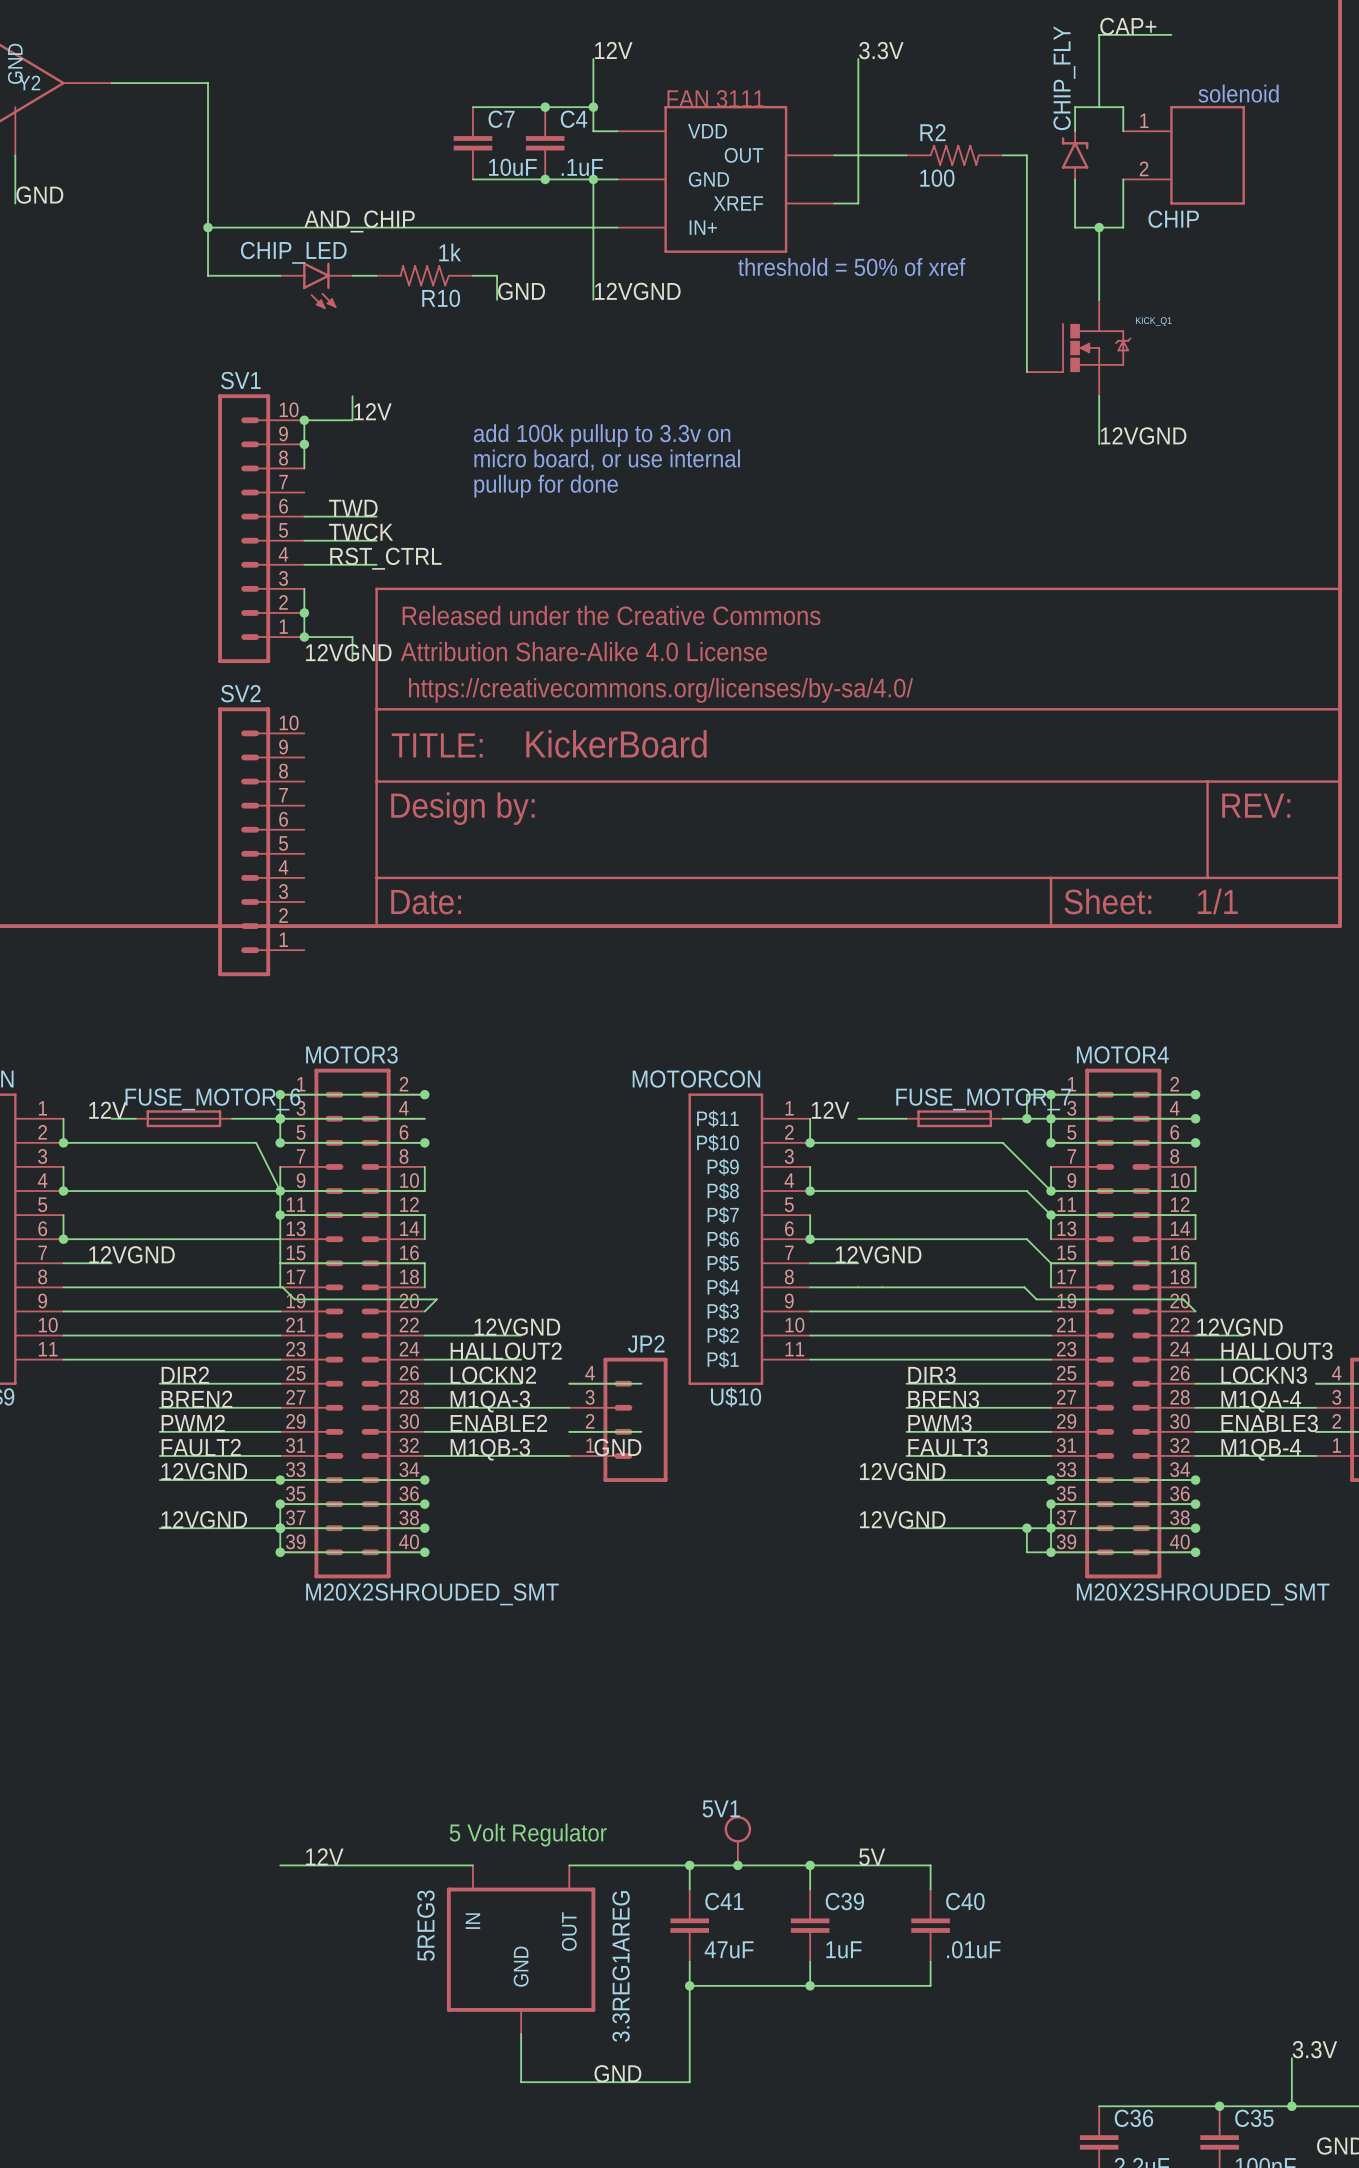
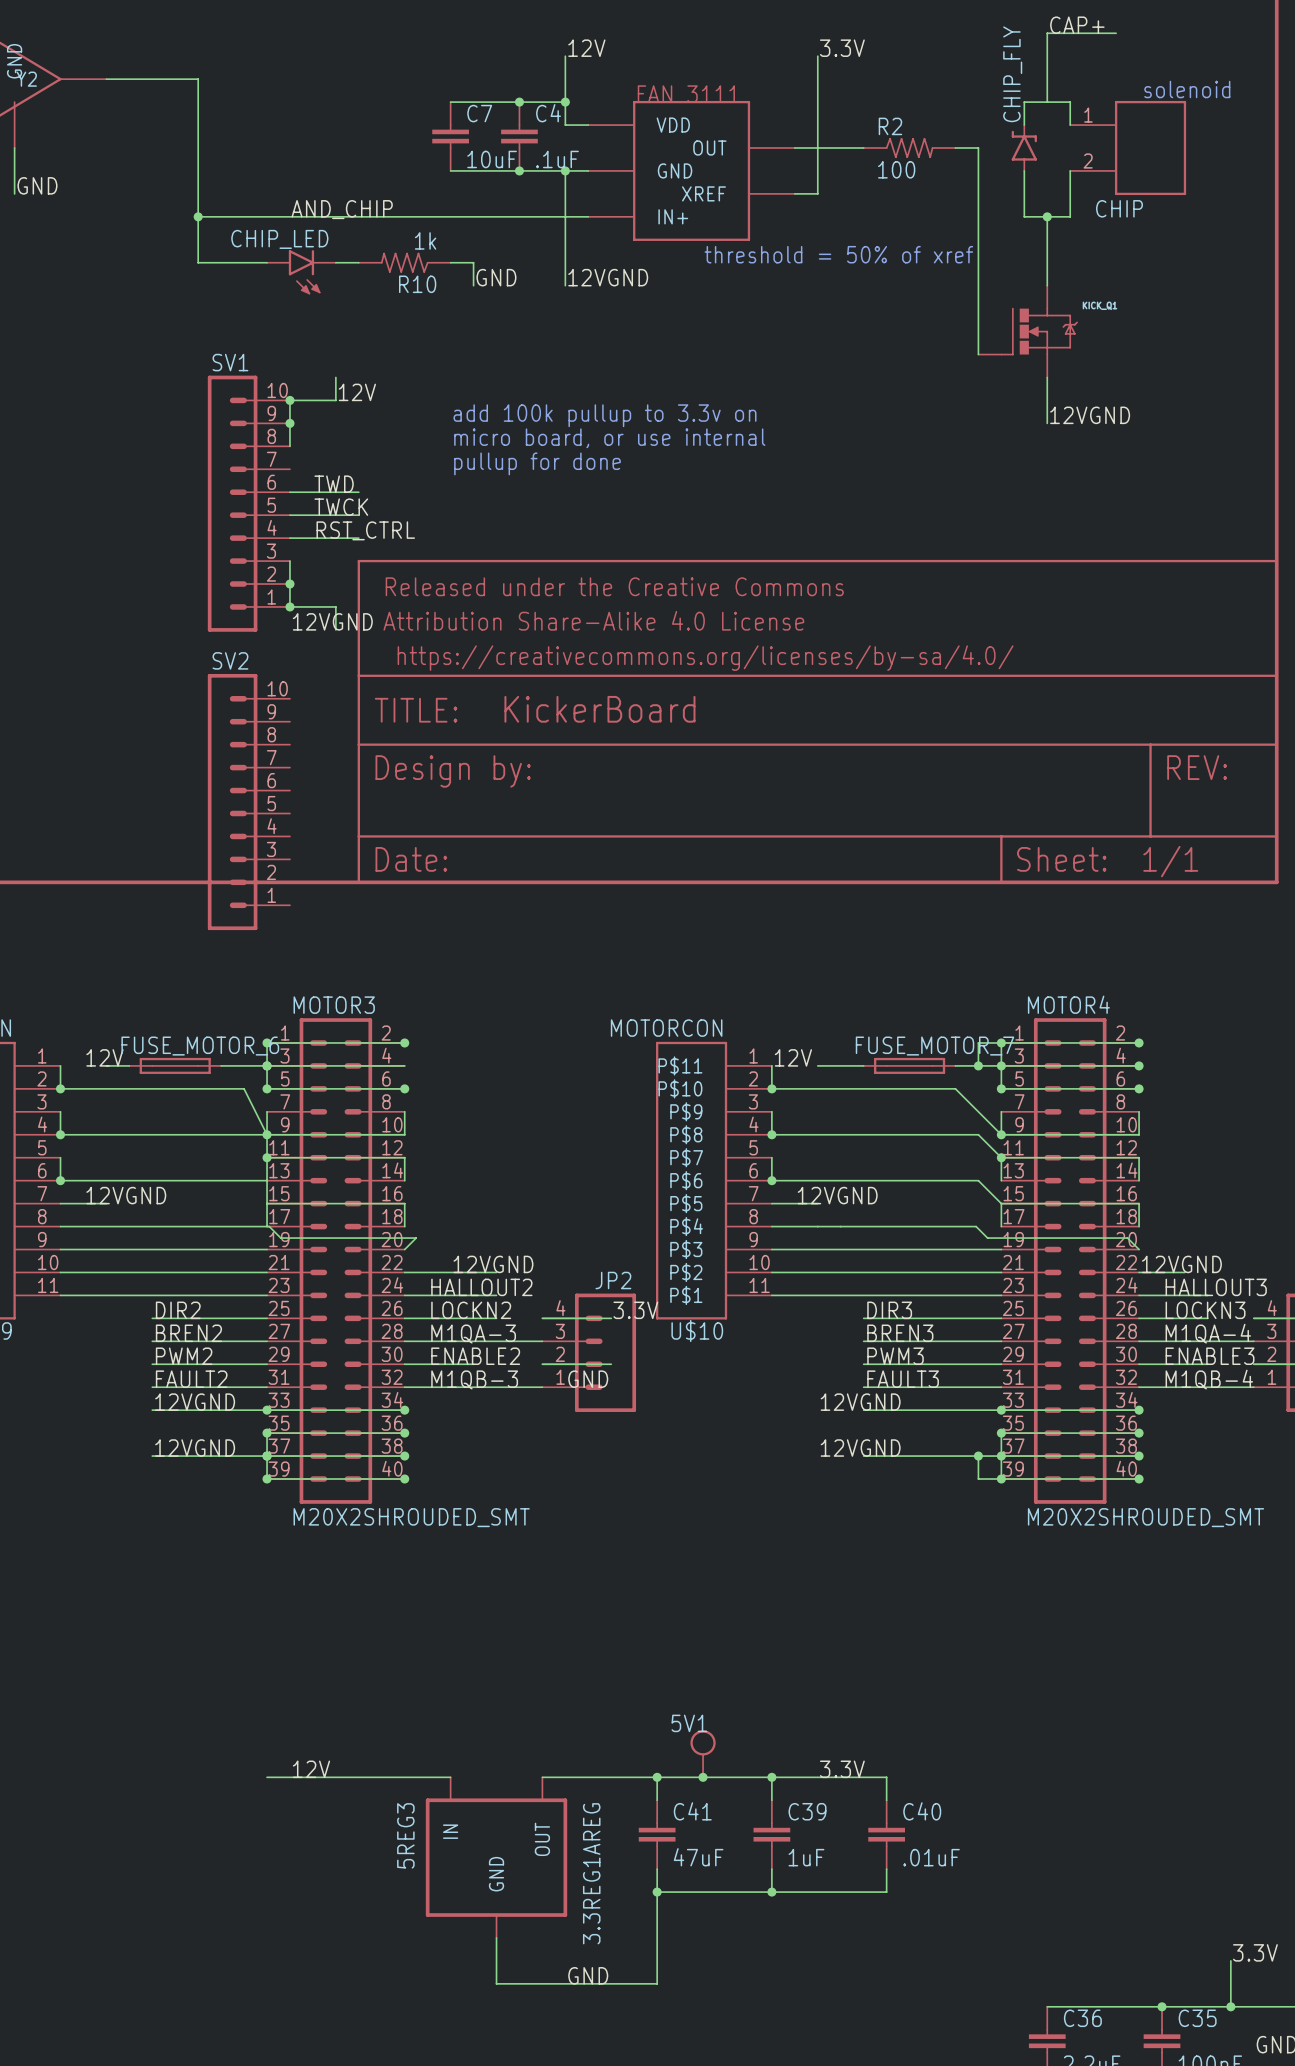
label: none -> 3.3V (635, 1310)
text: 5 Volt Regulator (528, 1835) -> none
label: 5V (872, 1857) -> 3.3V (842, 1769)

